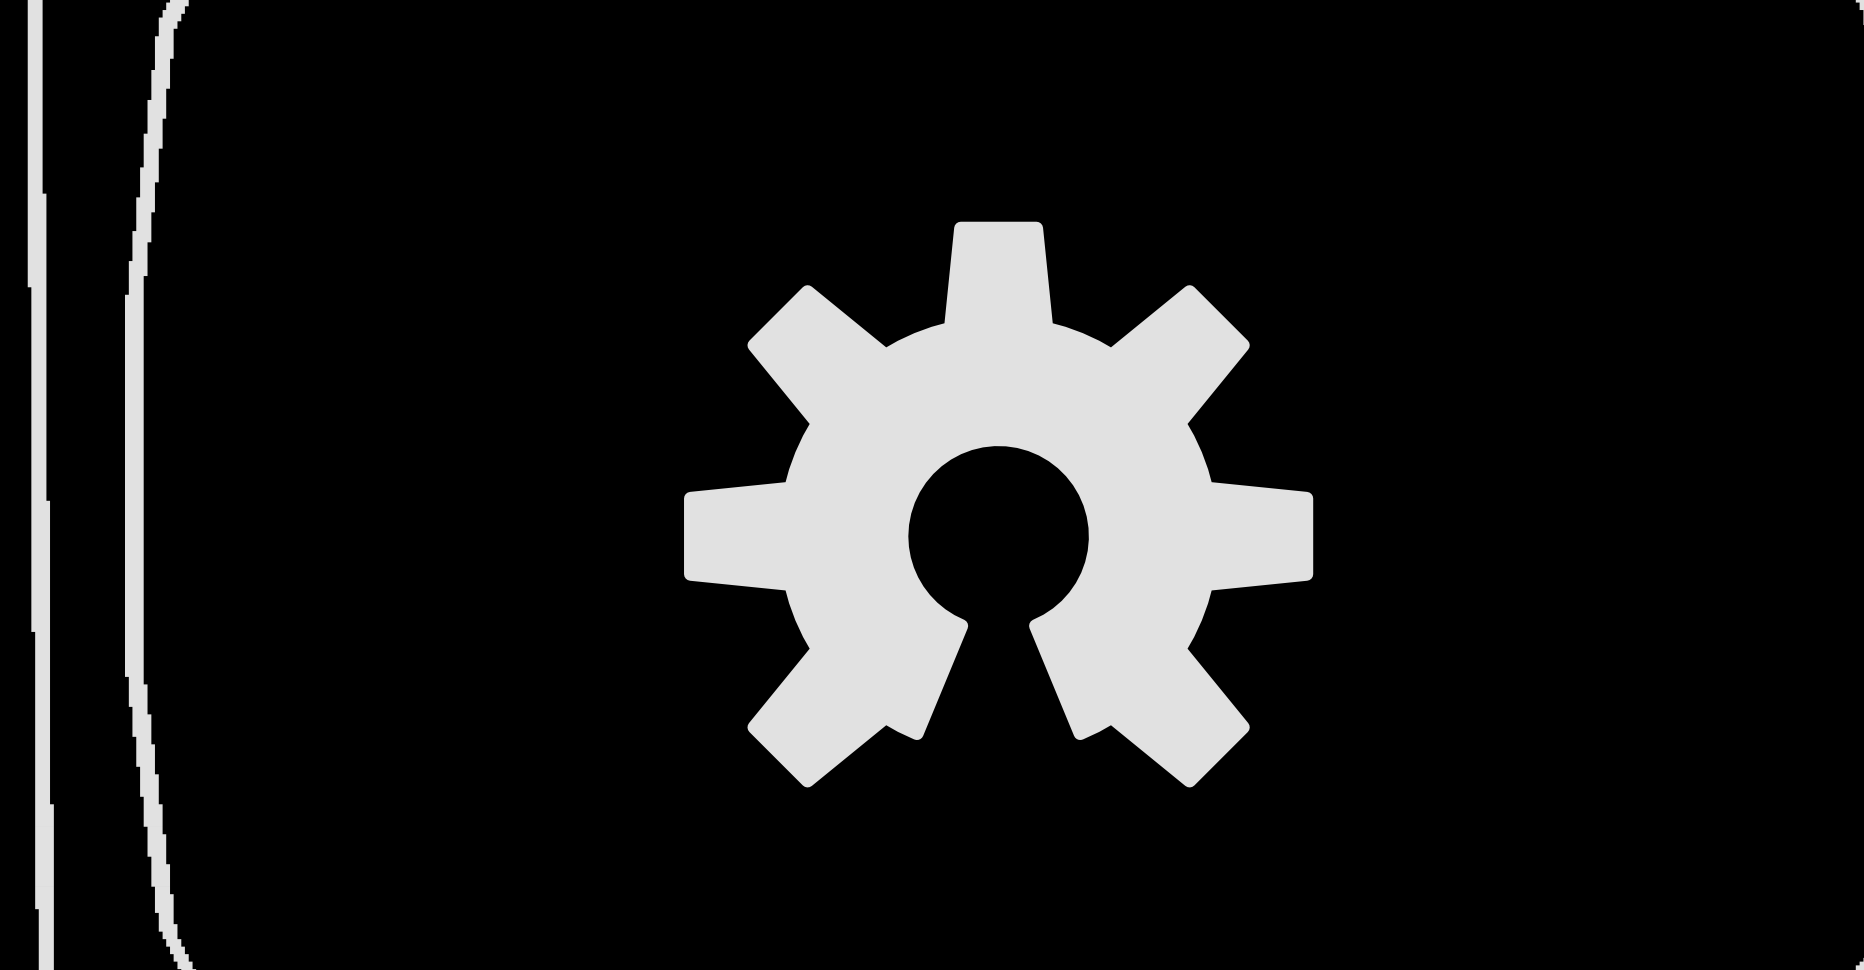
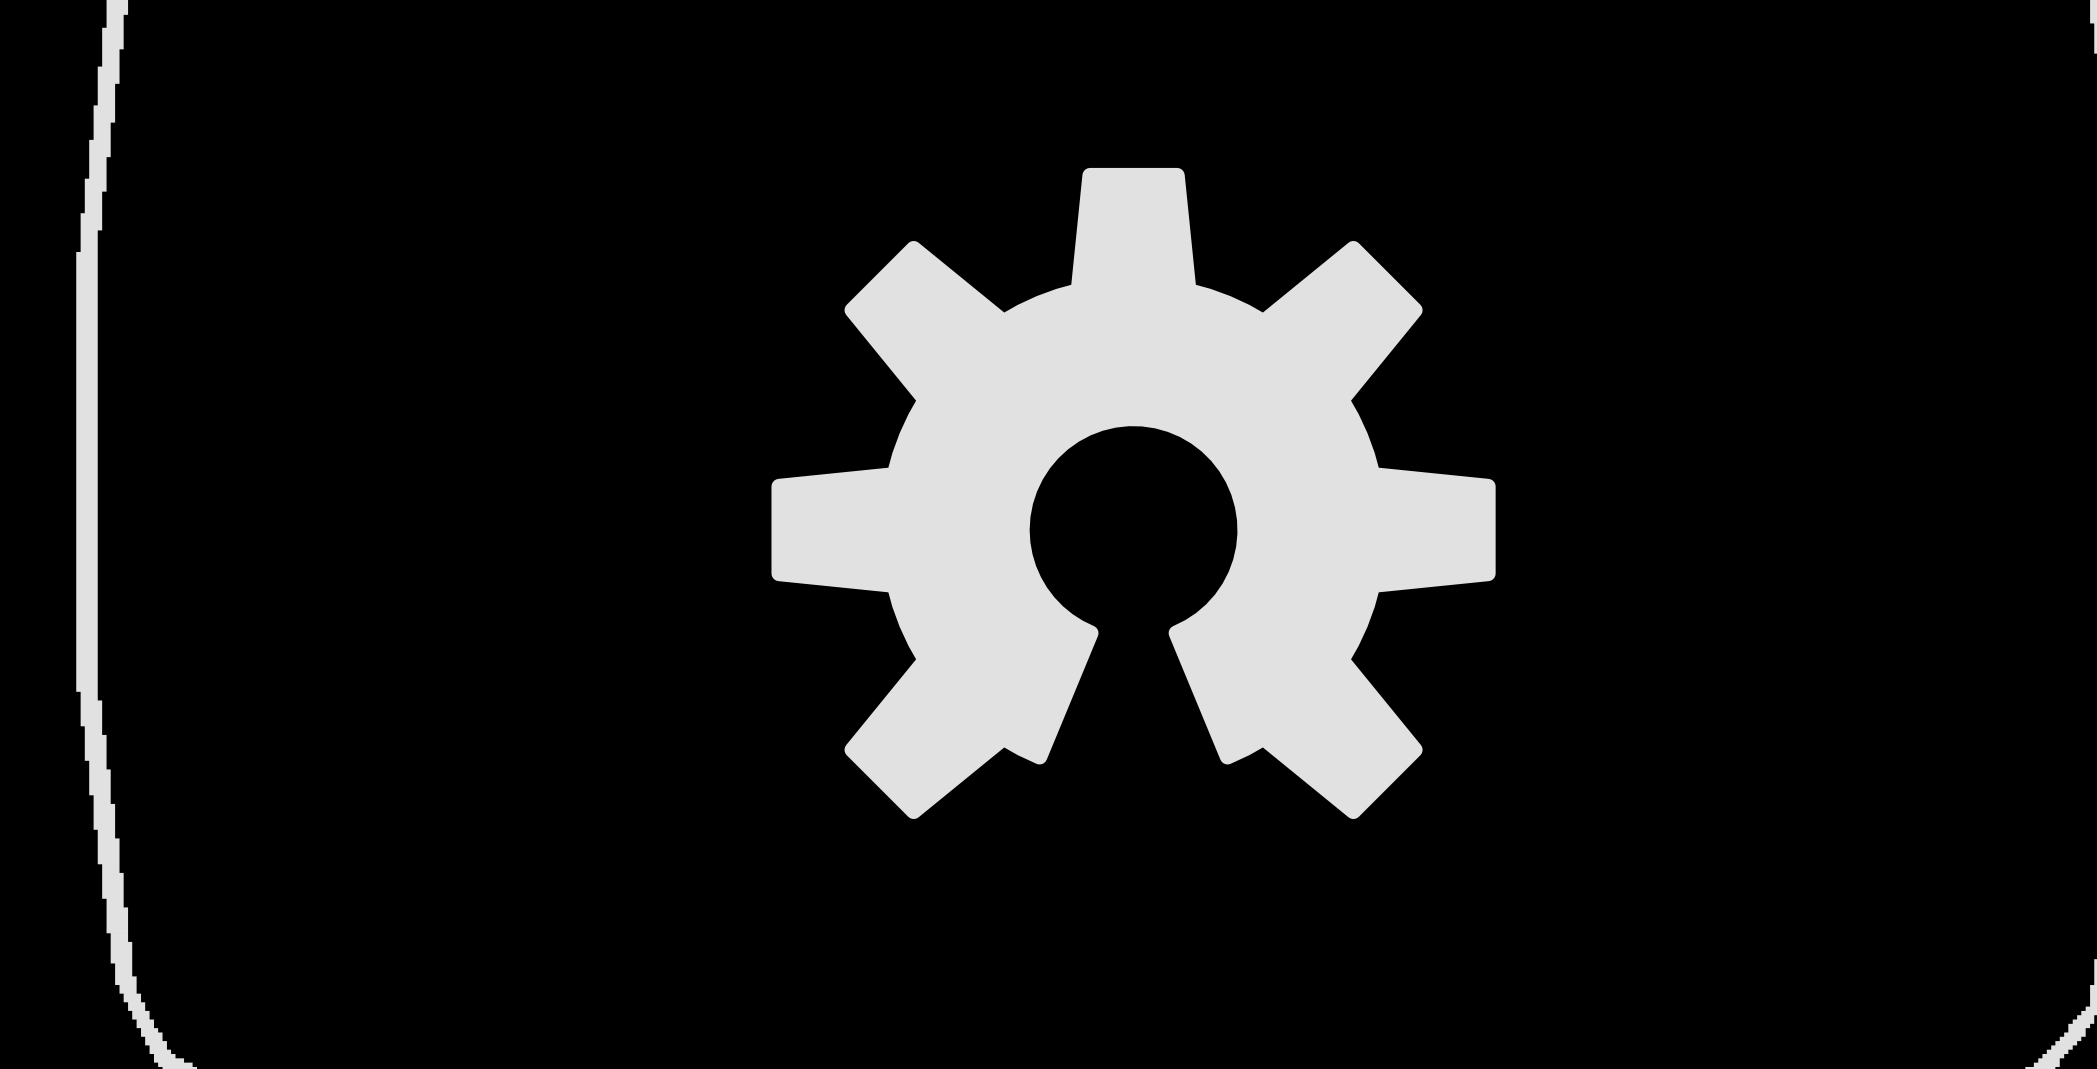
drawing position: (998, 504) -> (1133, 493)

